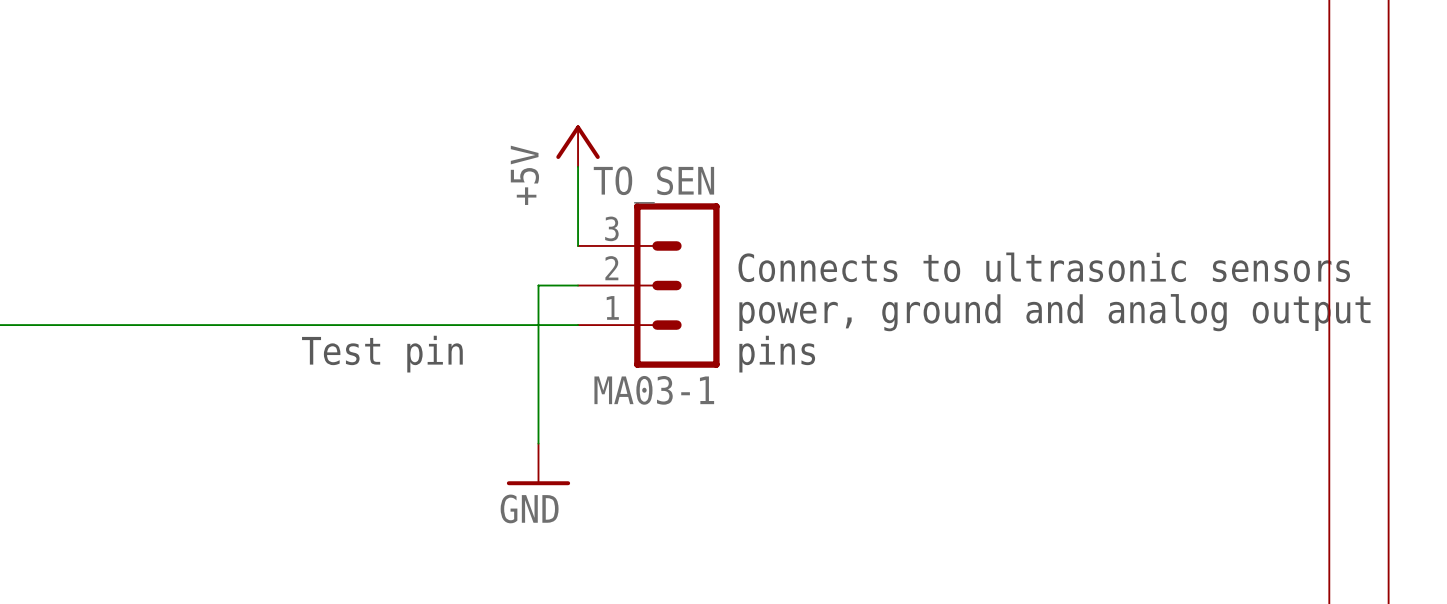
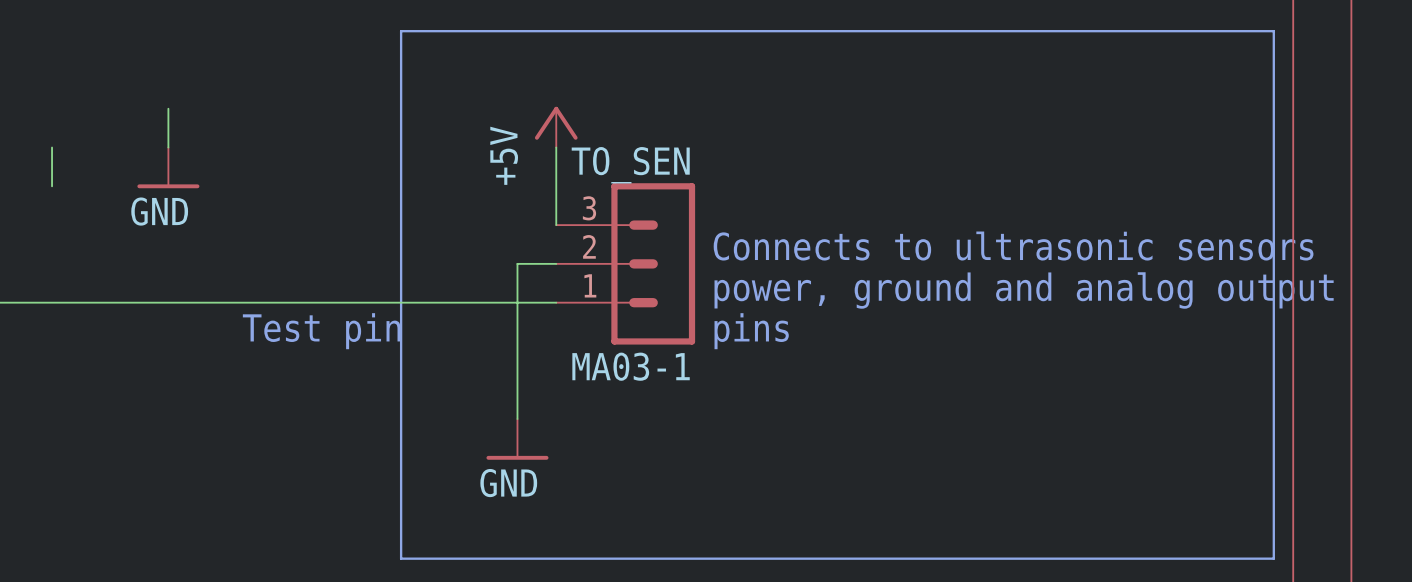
line: none -> (401, 31) (1273, 31) (1273, 558) (401, 558) (401, 31)
wire: none -> (168, 108) (168, 147)
wire: none -> (52, 147) (52, 186)
power symbol: none -> GND (168, 167)
text position: Test pin (382, 354) -> Test pin (321, 331)

